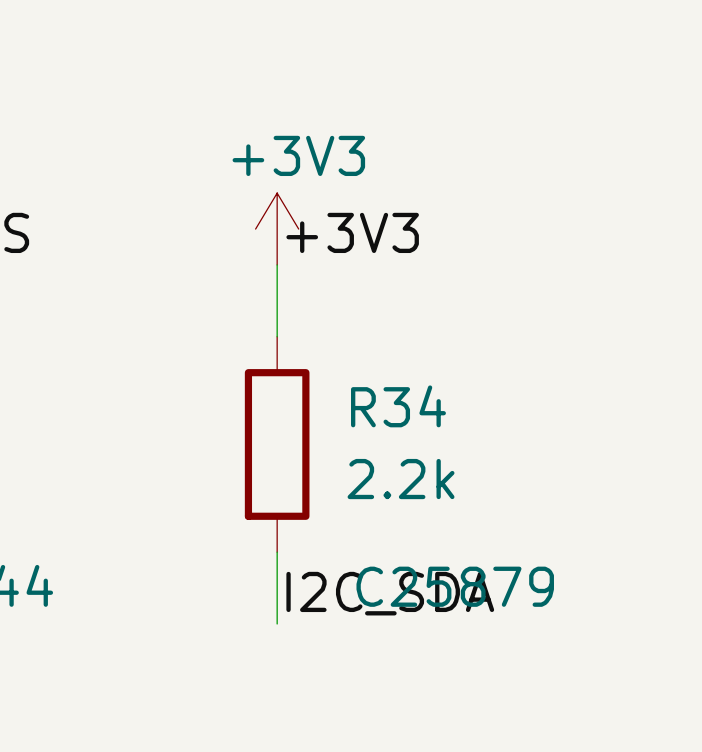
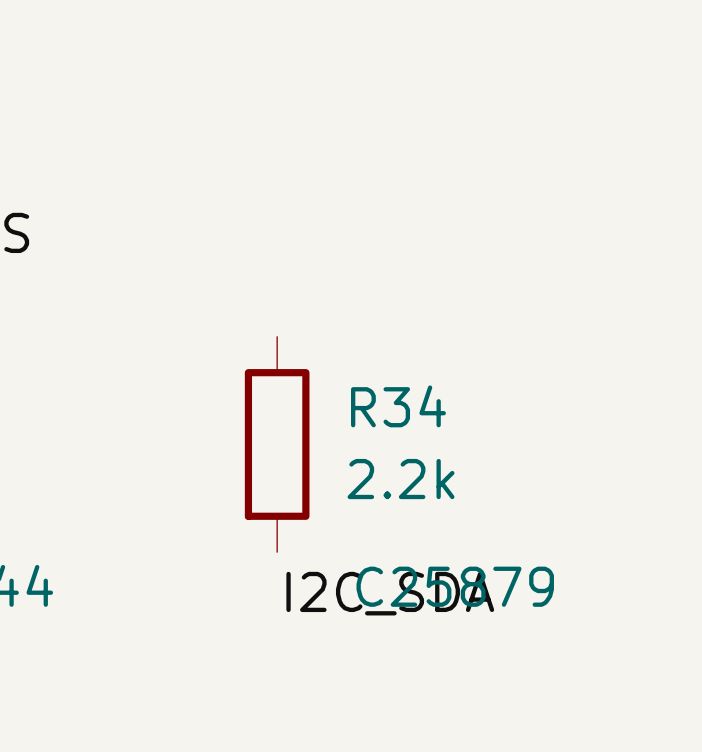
power symbol: +3V3 (277, 229) -> none
label: +3V3 (352, 232) -> none
wire: (277, 264) (277, 336) -> none
wire: (277, 552) (277, 623) -> none

